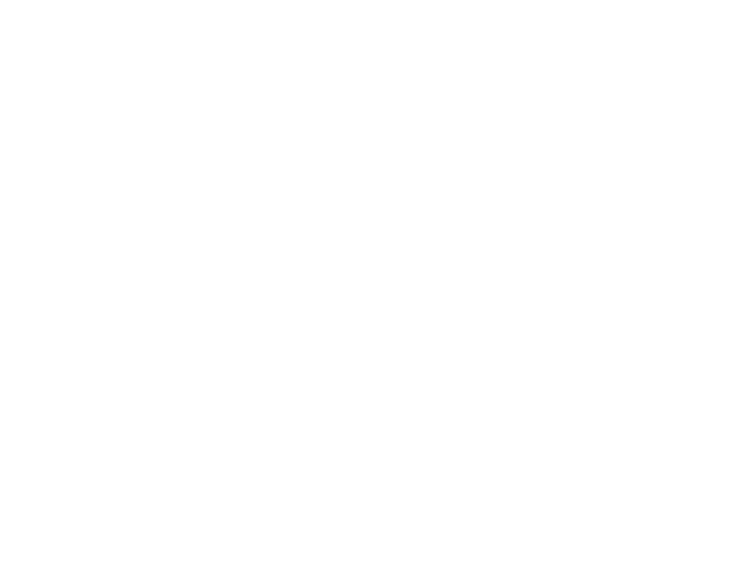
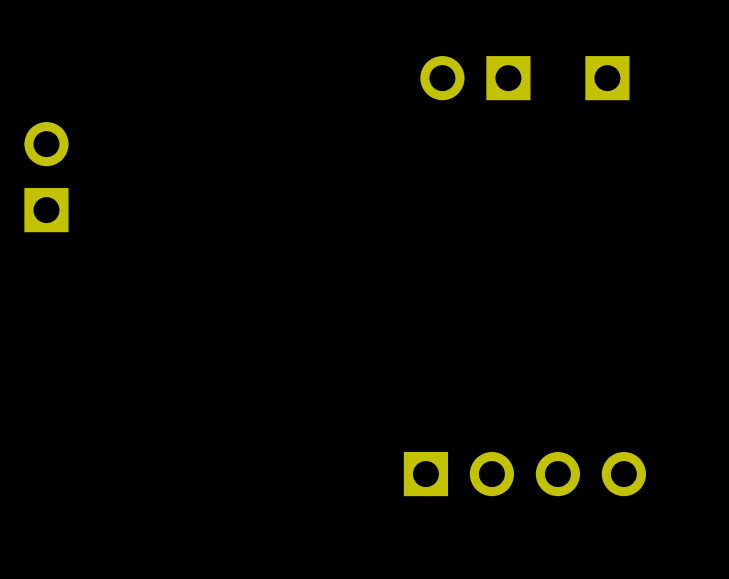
part: none -> (475, 78)
part: none -> (607, 78)
part: none -> (46, 177)
part: none -> (524, 474)

